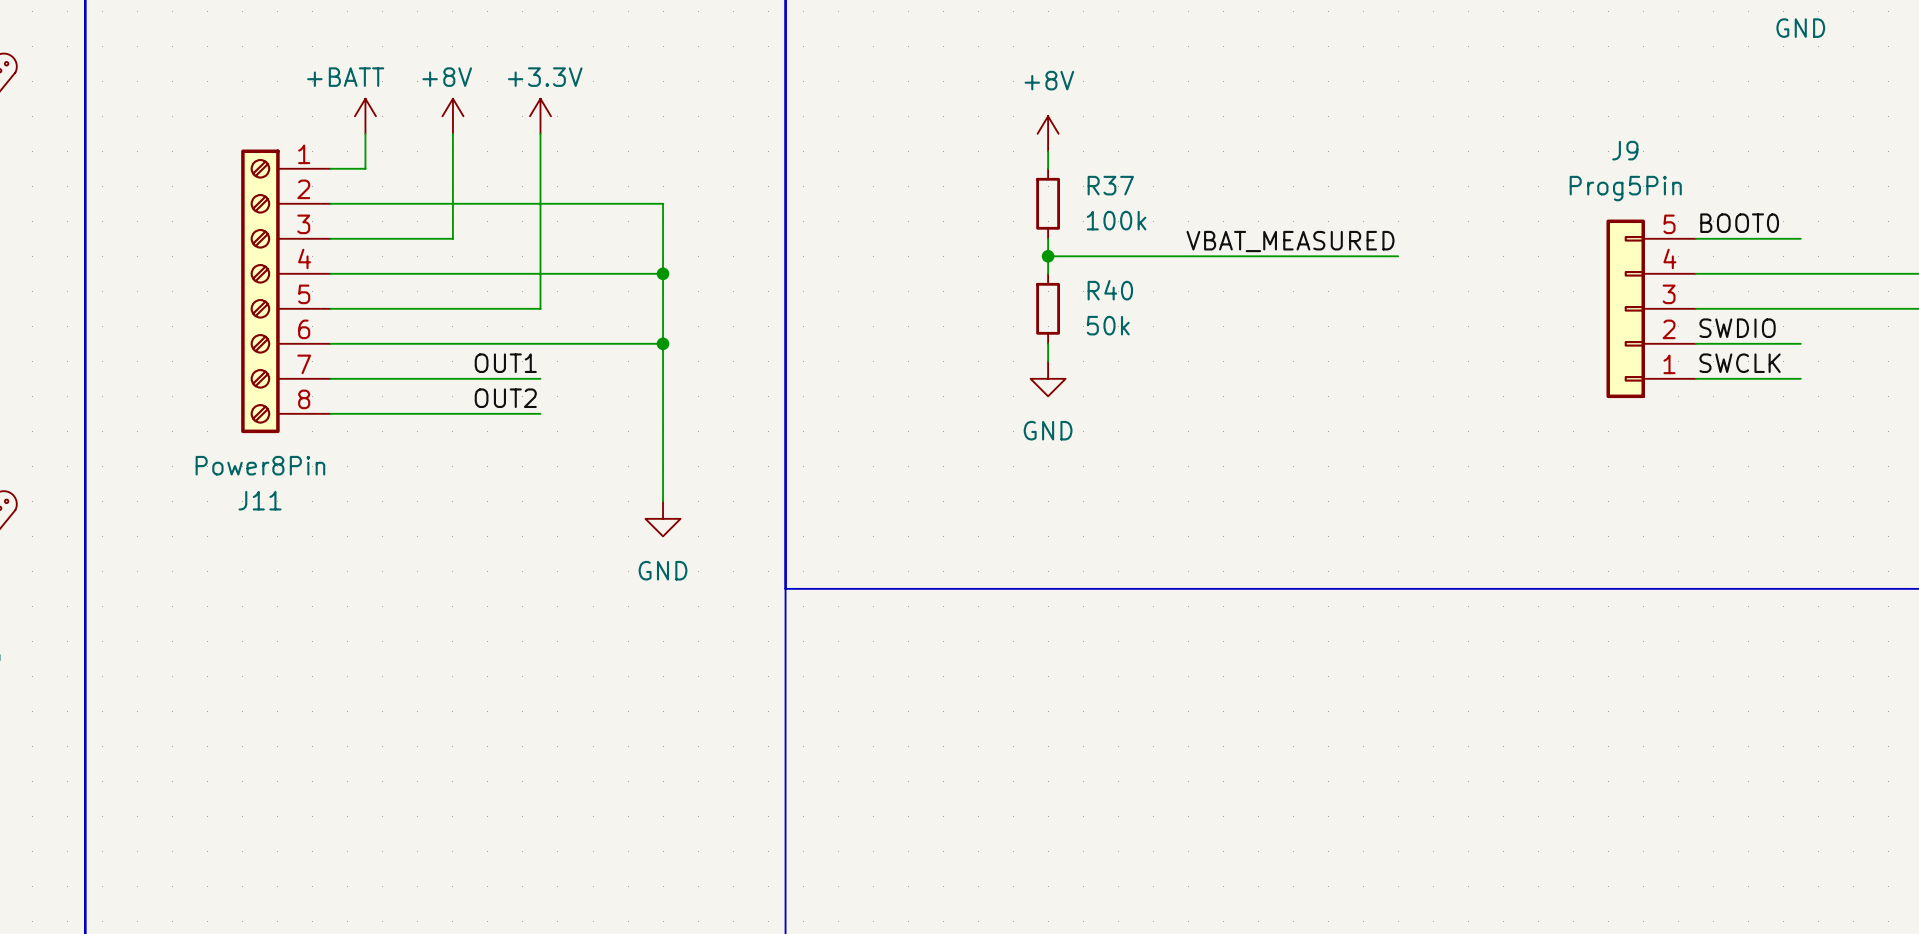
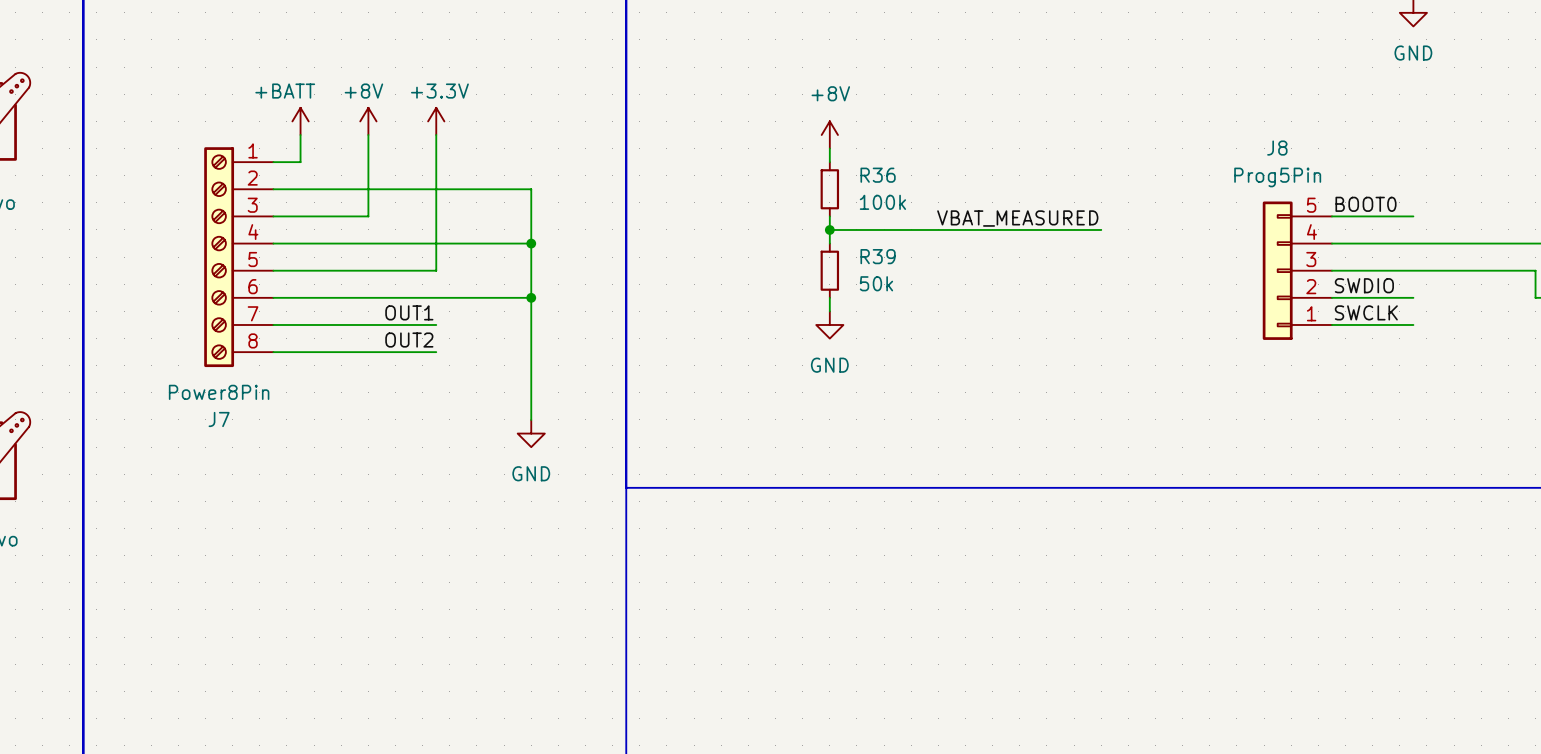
J9 name: J9 (1625, 150) -> J8 (1277, 148)
R37 name: R37 (1110, 185) -> R36 (878, 175)
R40 name: R40 (1110, 290) -> R39 (878, 256)
J11 name: J11 (260, 500) -> J7 (219, 419)

